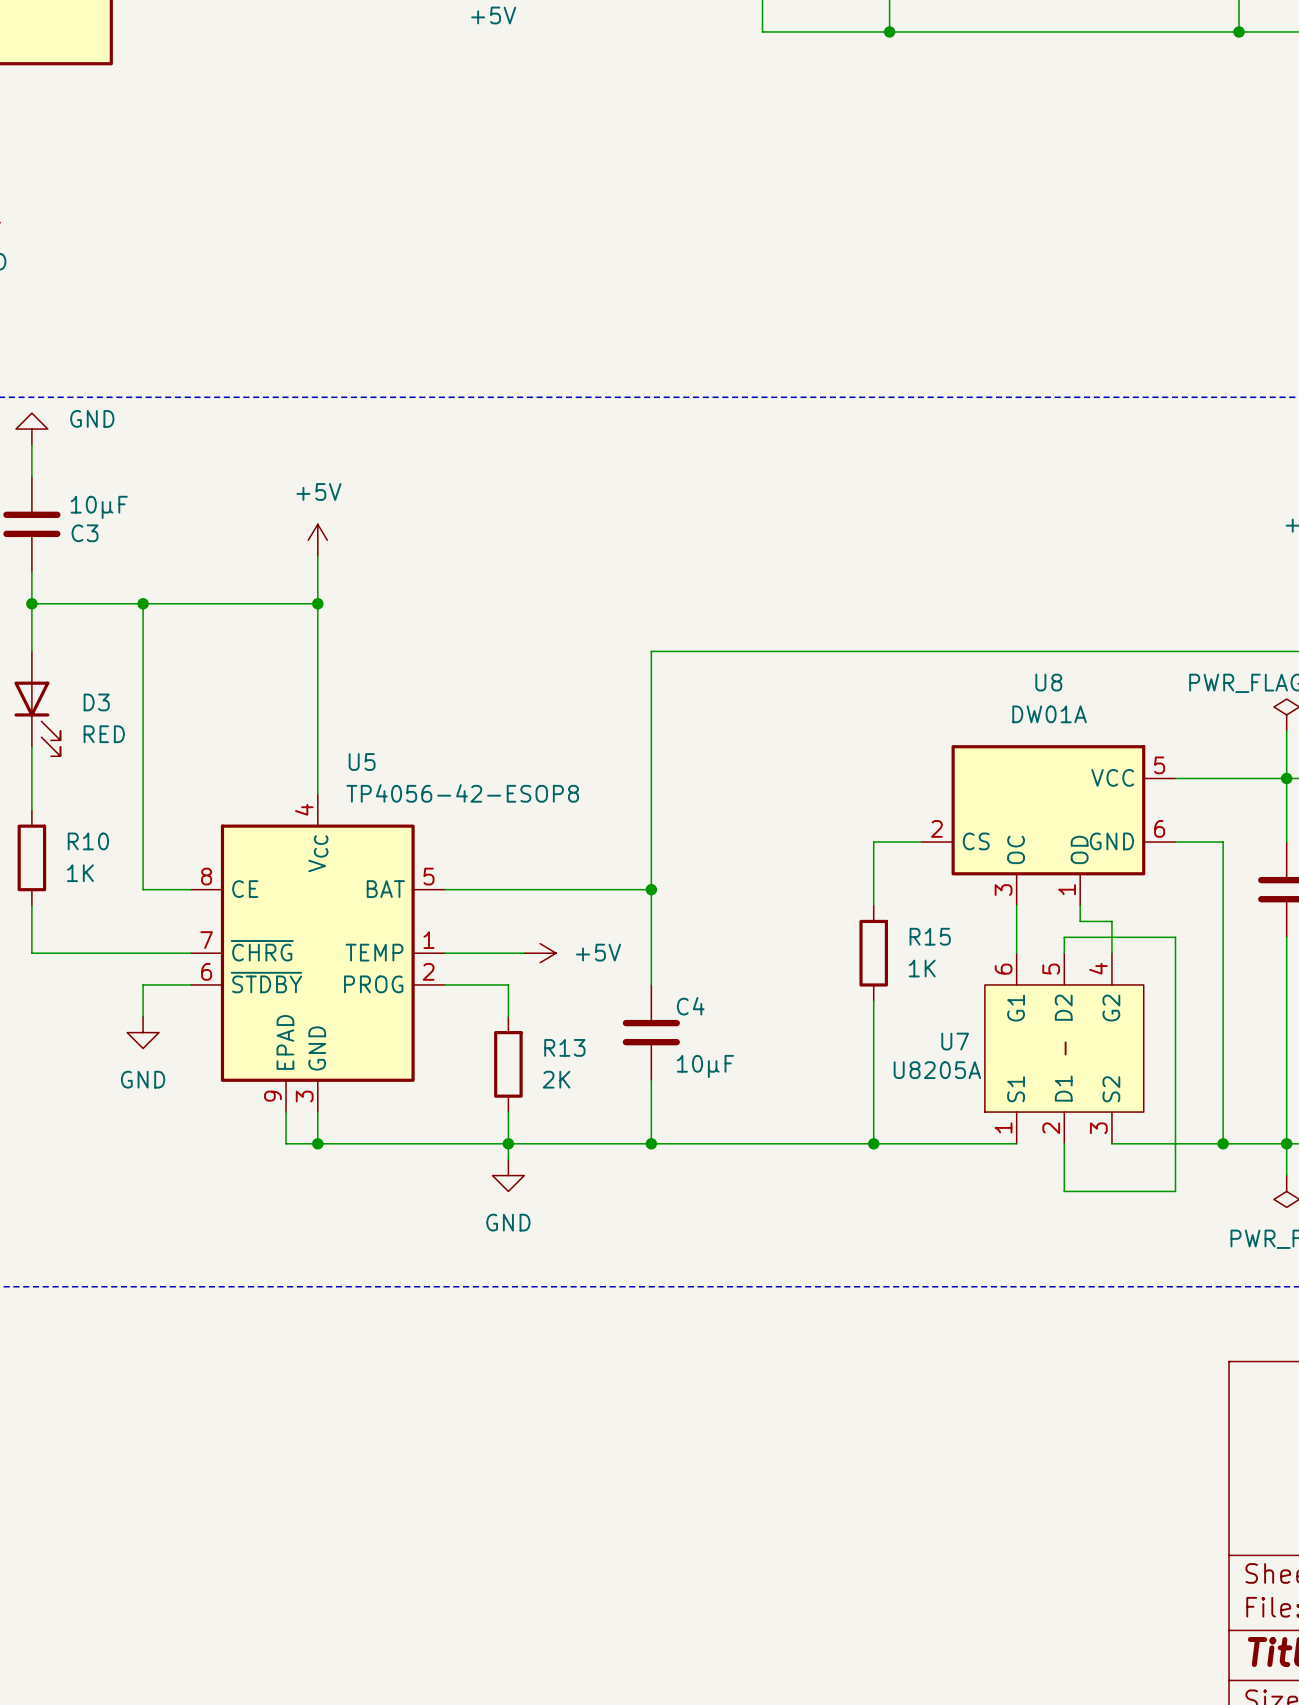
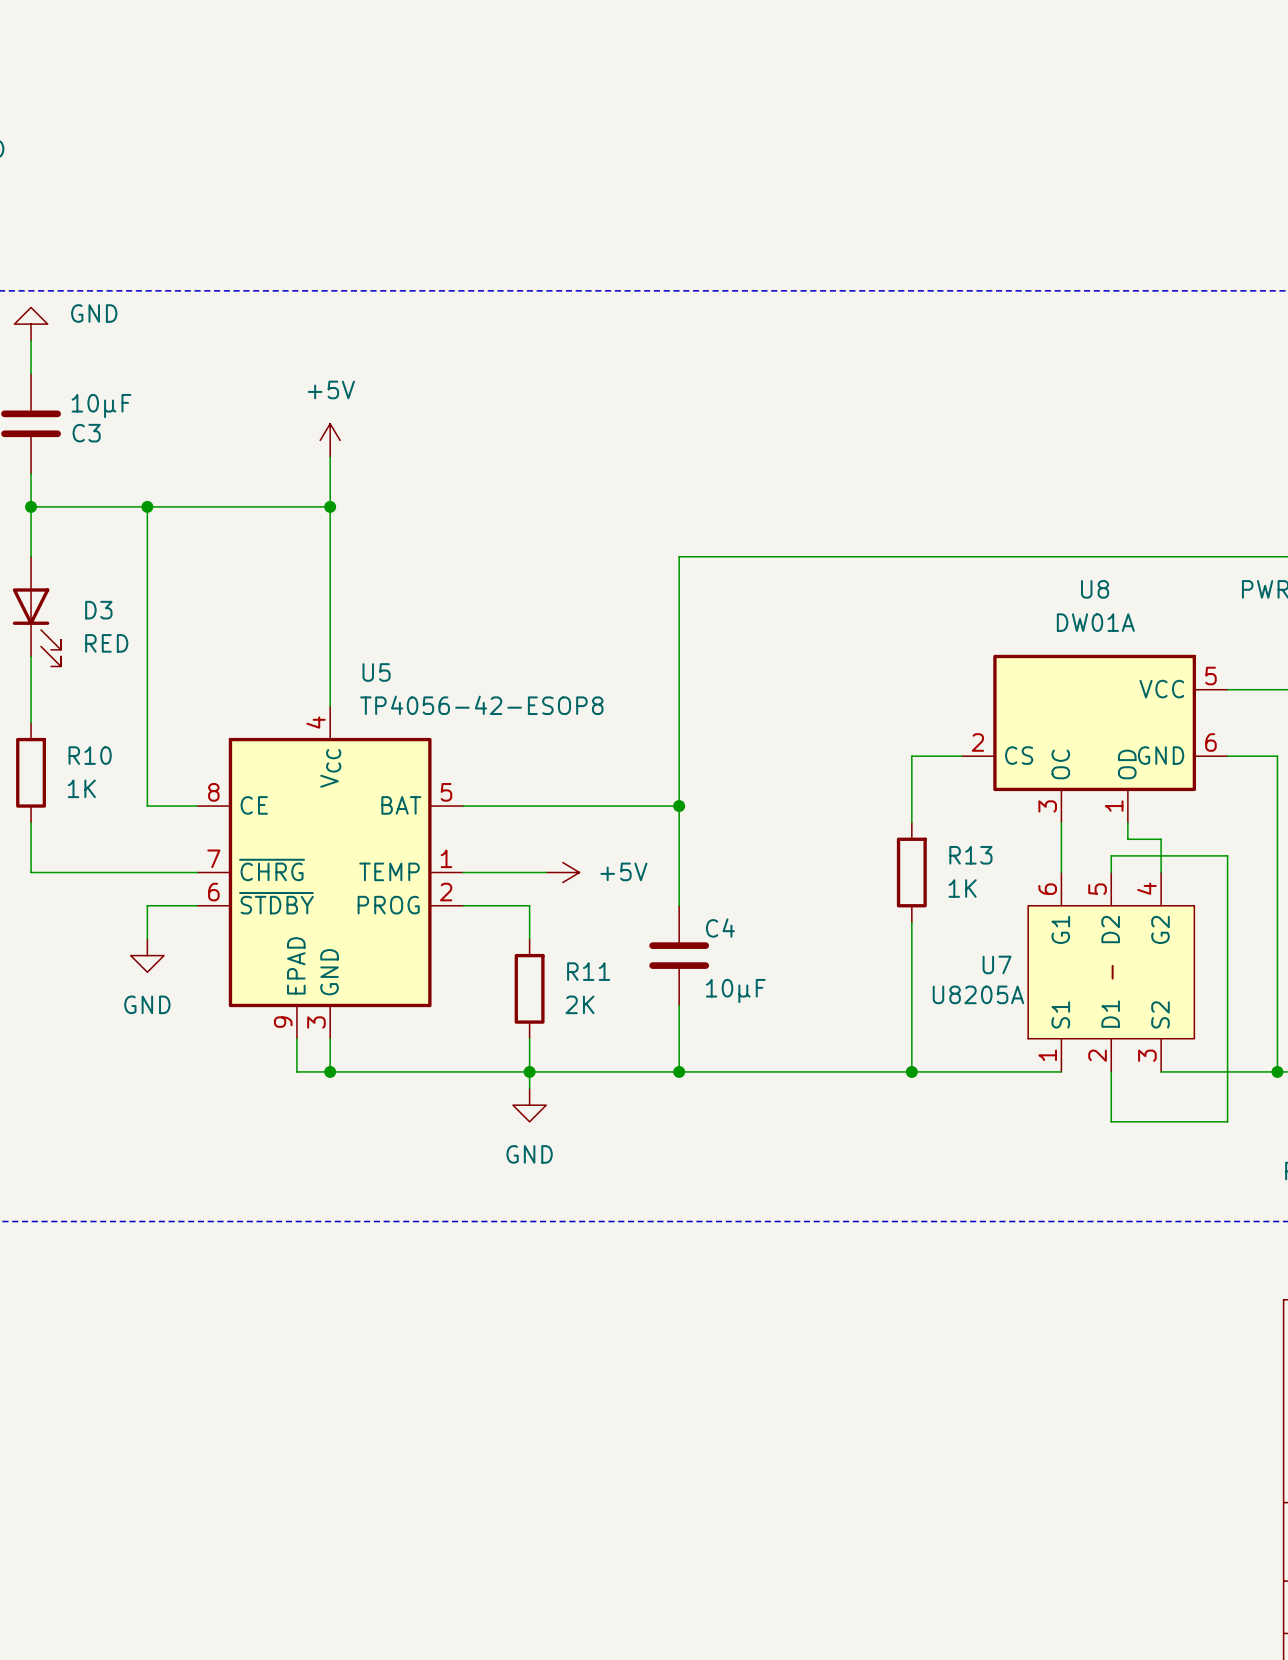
R15 name: R15 (930, 936) -> R13 (970, 855)
R13 name: R13 (564, 1047) -> R11 (588, 971)

